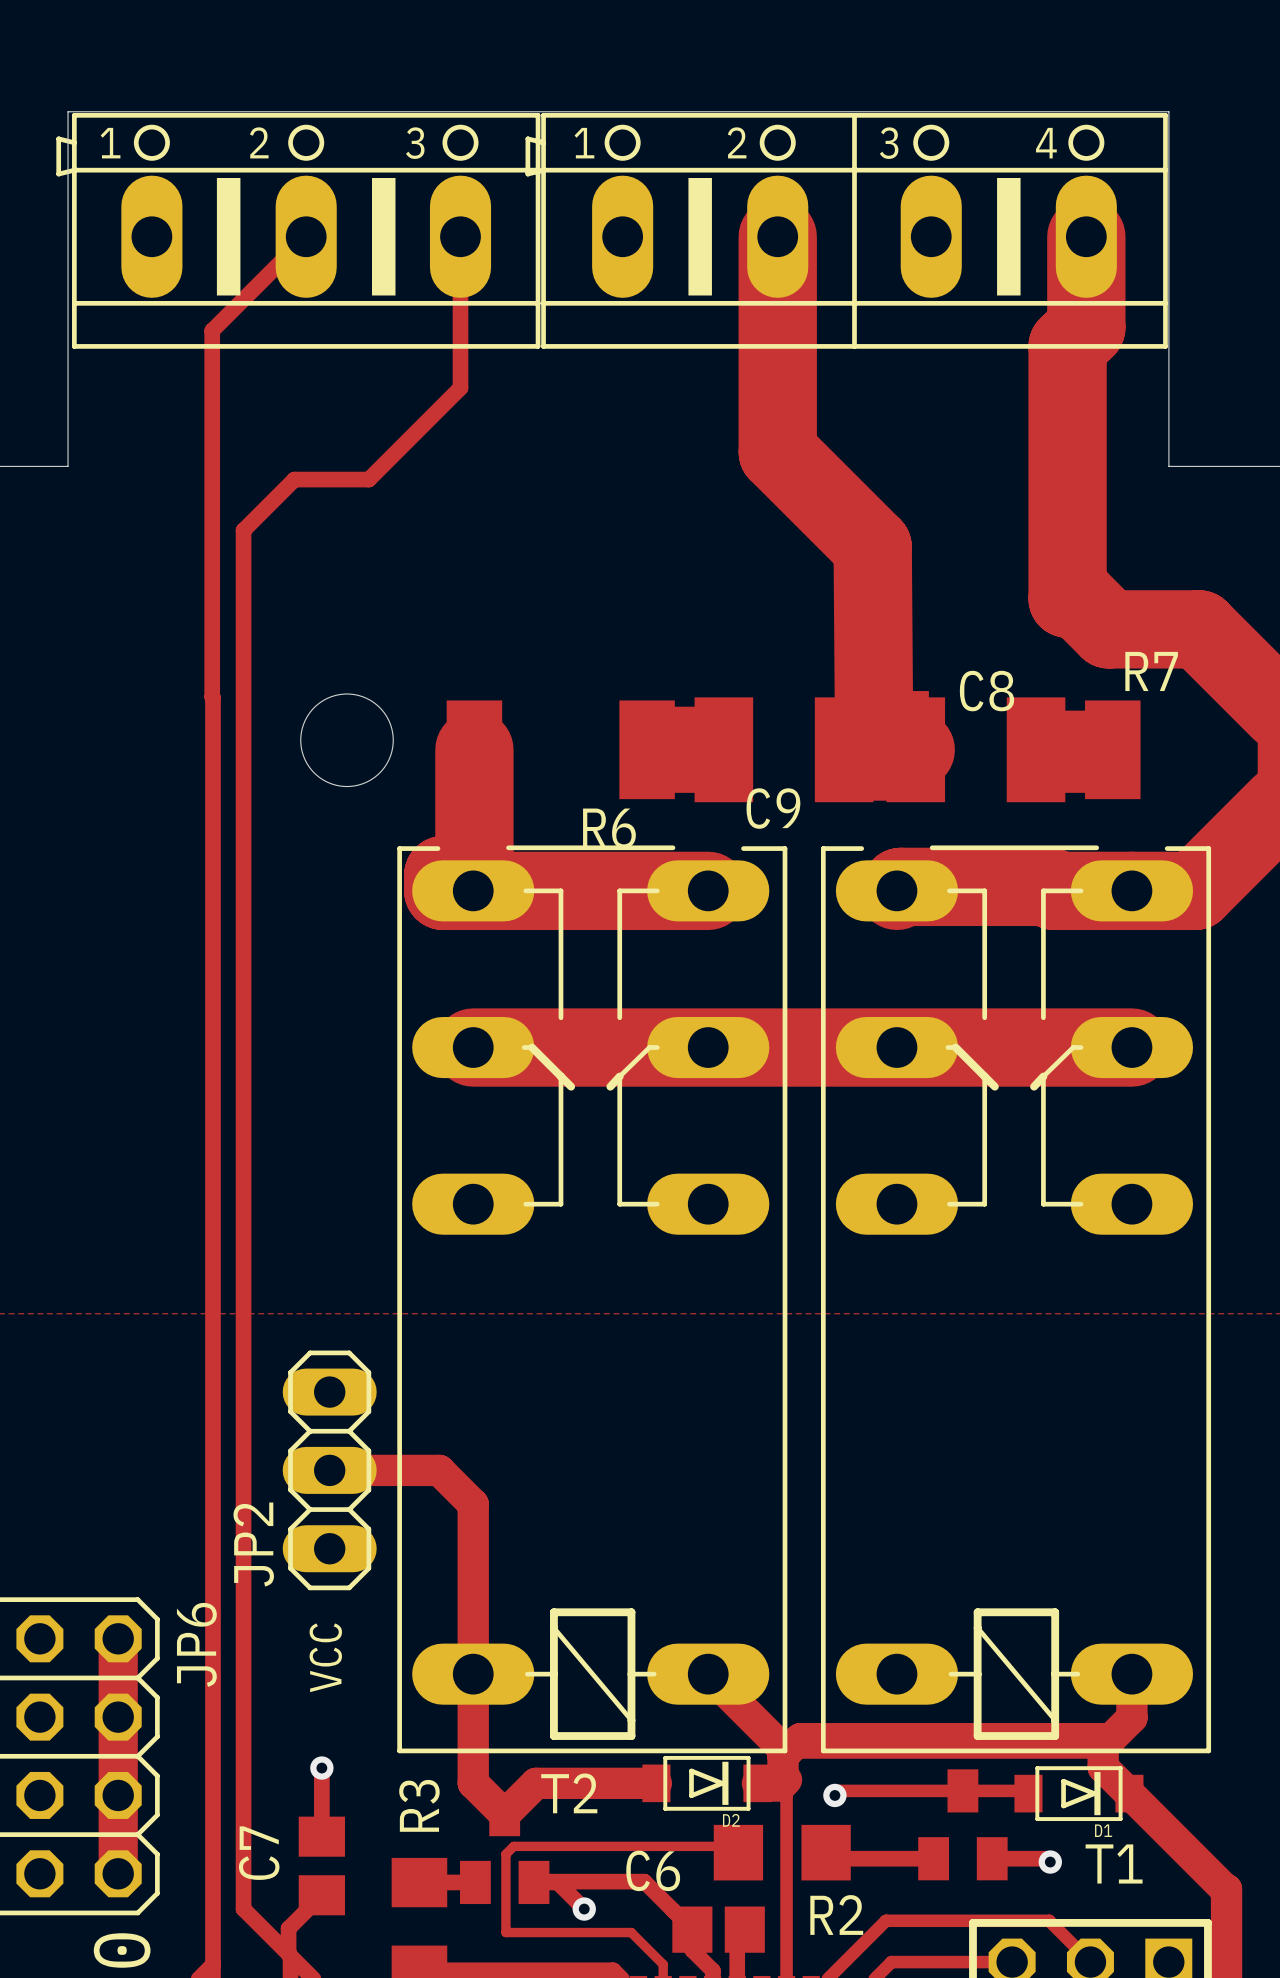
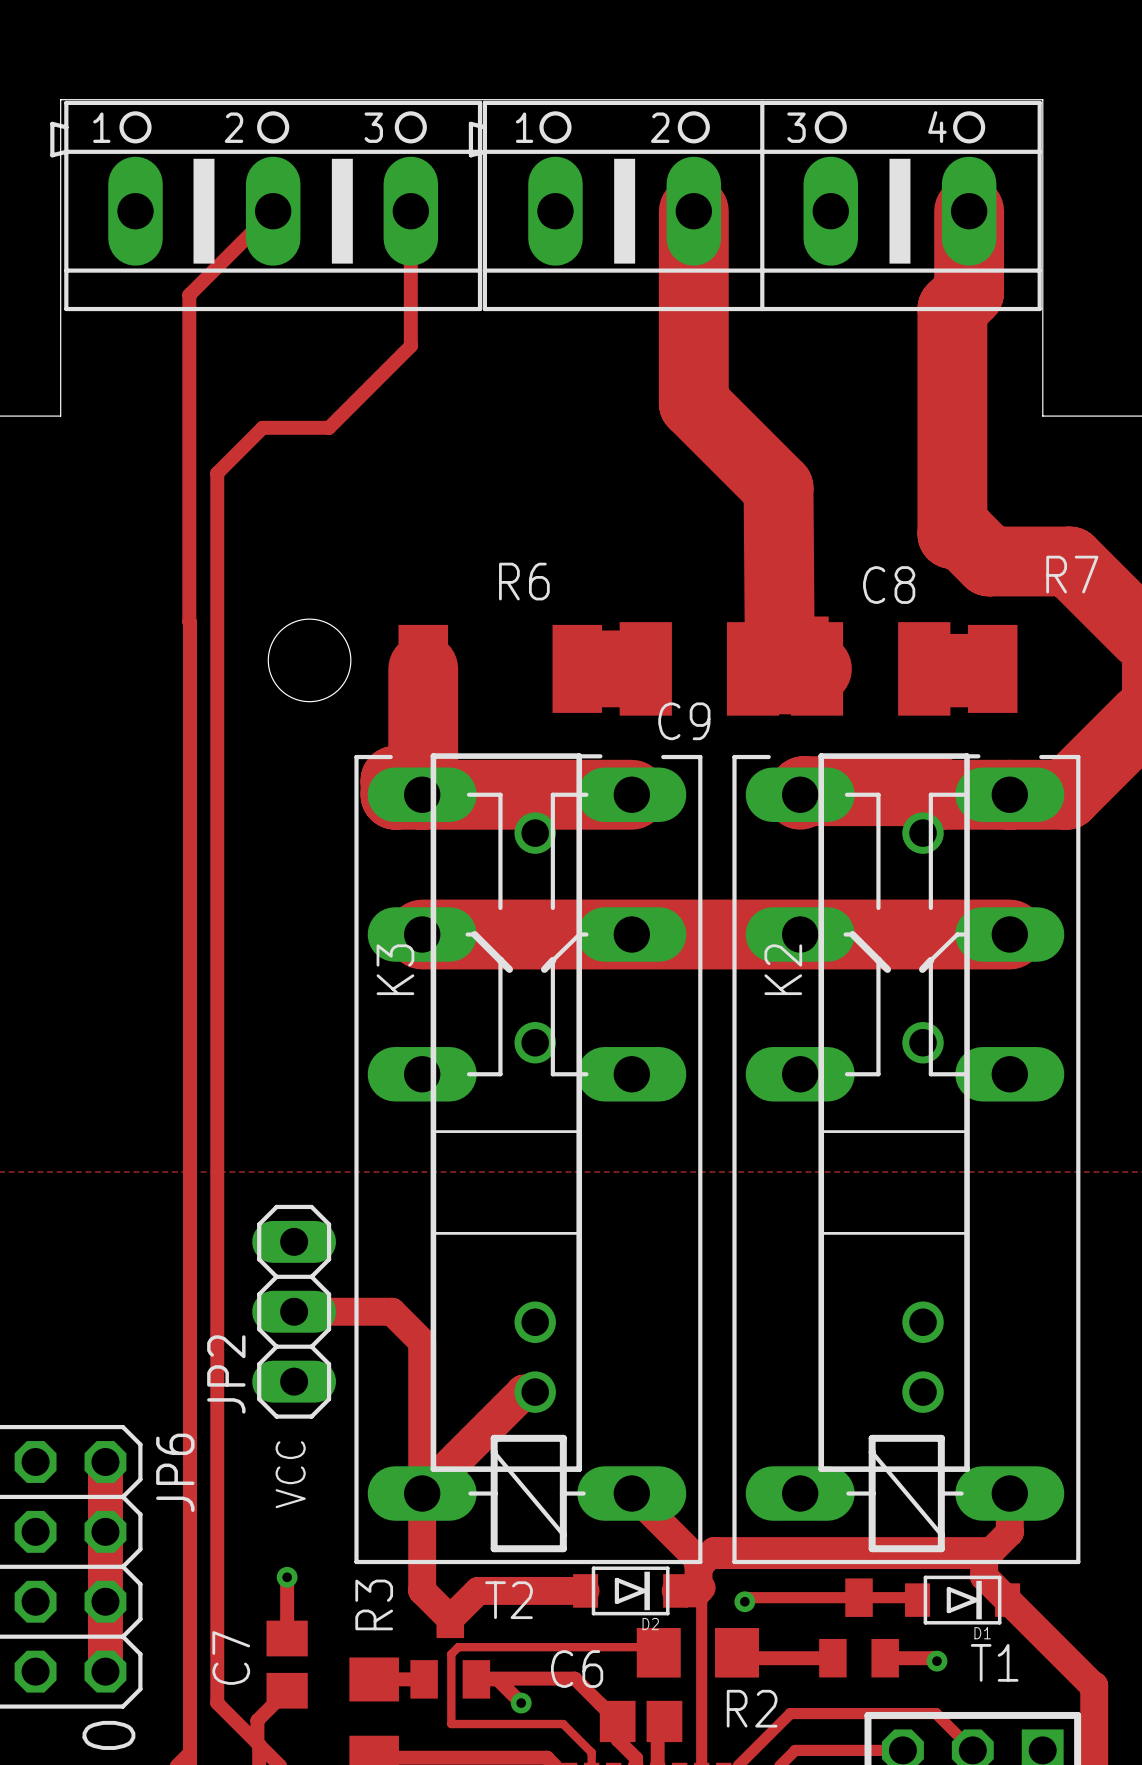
R7 name position: R7 (1151, 671) -> R7 (1072, 574)
C8 name position: C8 (987, 691) -> C8 (889, 585)
R6 name position: R6 (609, 828) -> R6 (524, 581)
K3: none -> (506, 1112)
K2: none -> (894, 1112)
track: none -> (535, 1392) (523, 1392) (422, 1493)

